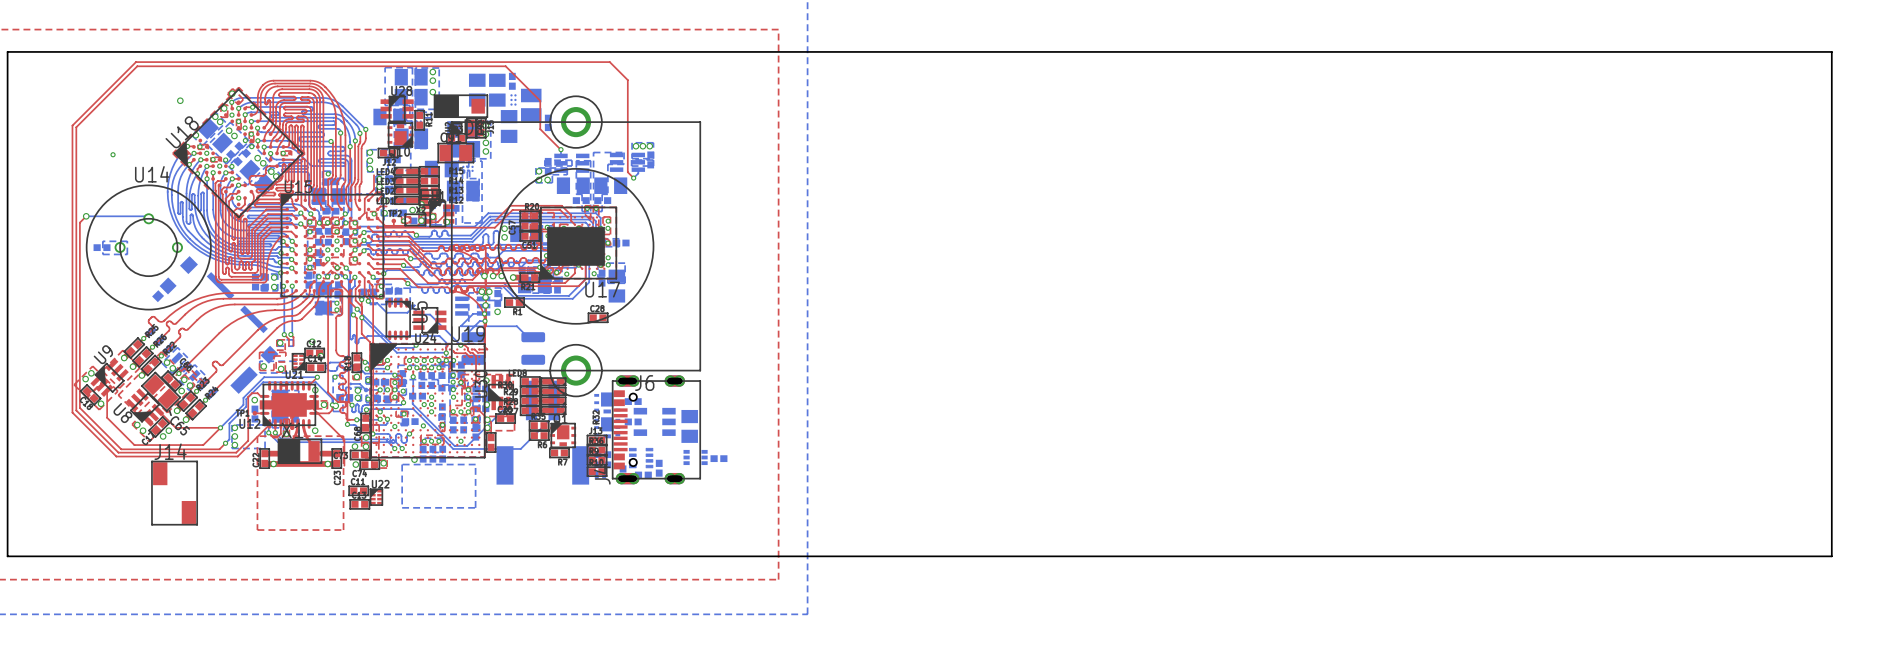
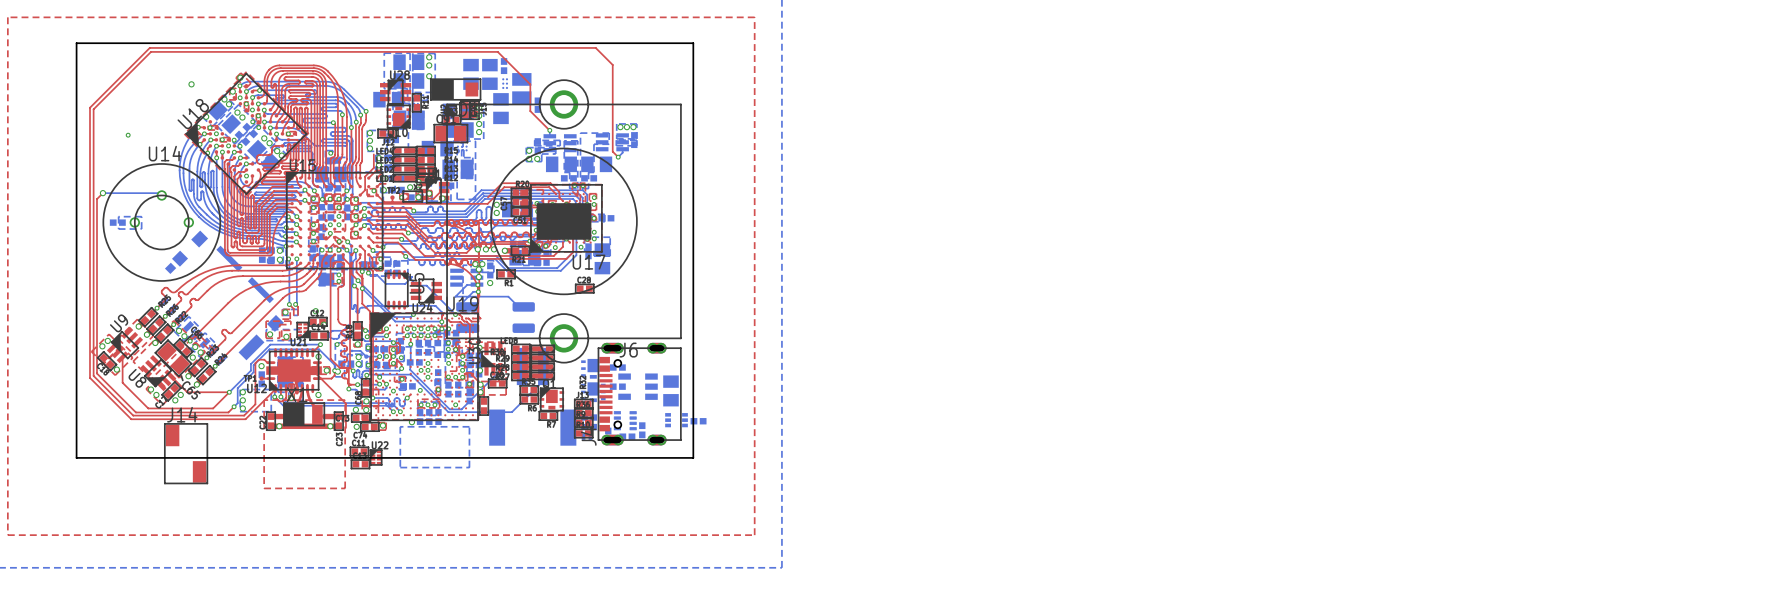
board edge: (7, 51) (7, 556) (1831, 556) (1831, 51) (7, 51) -> none
board edge: none -> (76, 43) (76, 457) (693, 457) (693, 43) (76, 43)

